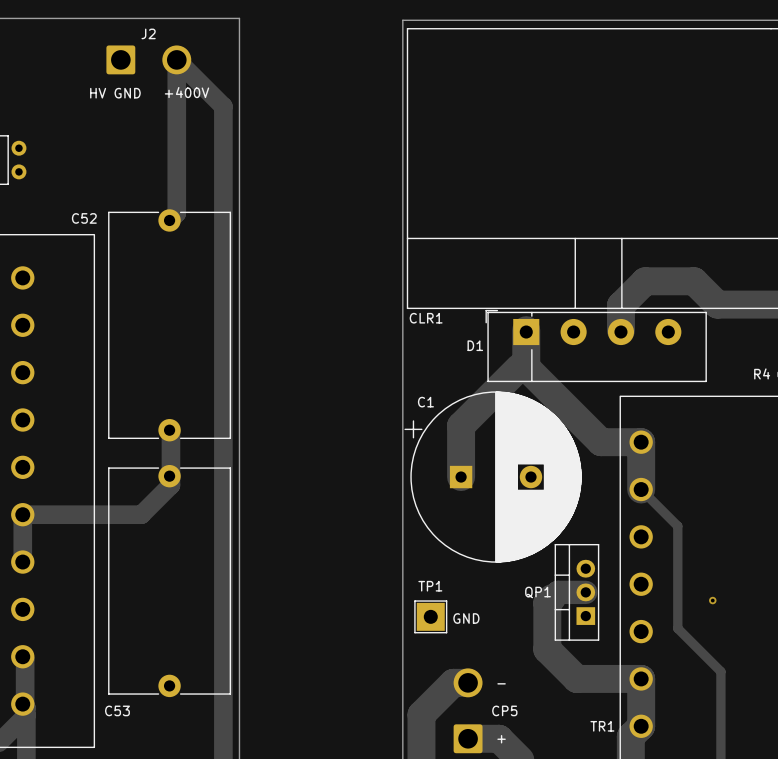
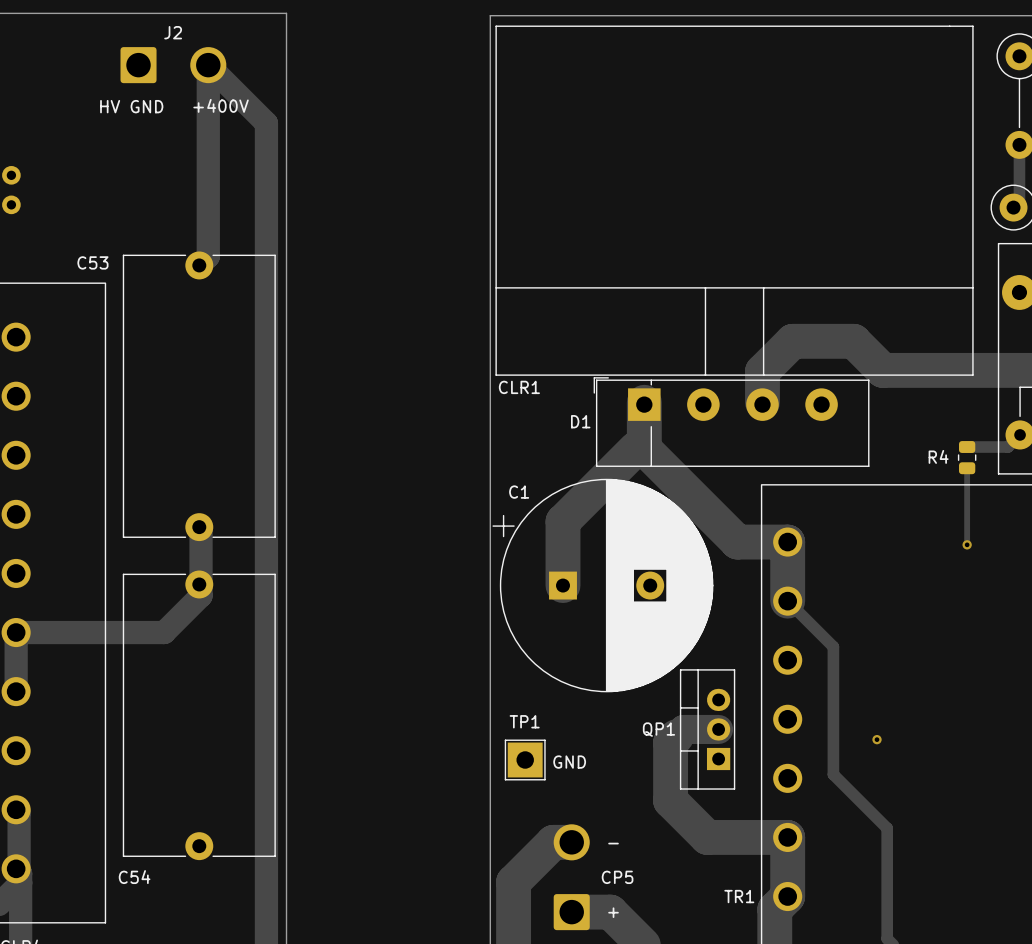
C52 name: C52 (84, 218) -> C53 (92, 262)
C53 name: C53 (117, 710) -> C54 (134, 877)

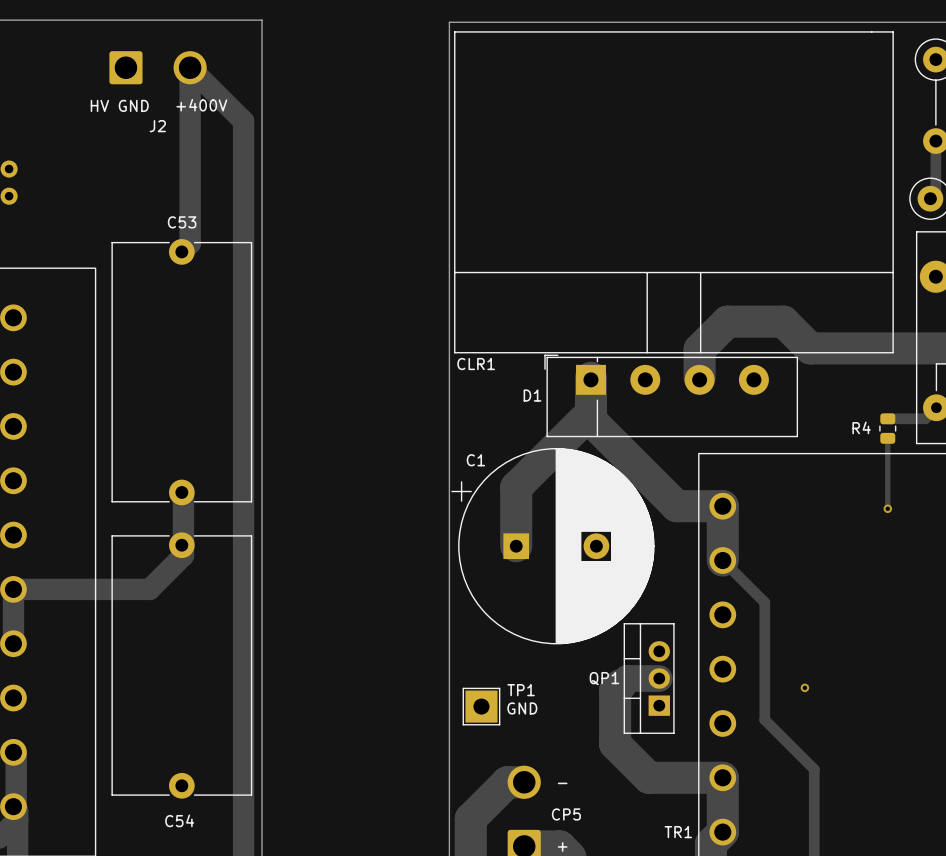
J2 name position: J2 (173, 32) -> J2 (157, 126)
C53 name position: C53 (92, 262) -> C53 (182, 222)
TP1 name position: TP1 (524, 721) -> TP1 (521, 690)
C54 name position: C54 (134, 877) -> C54 (179, 820)

